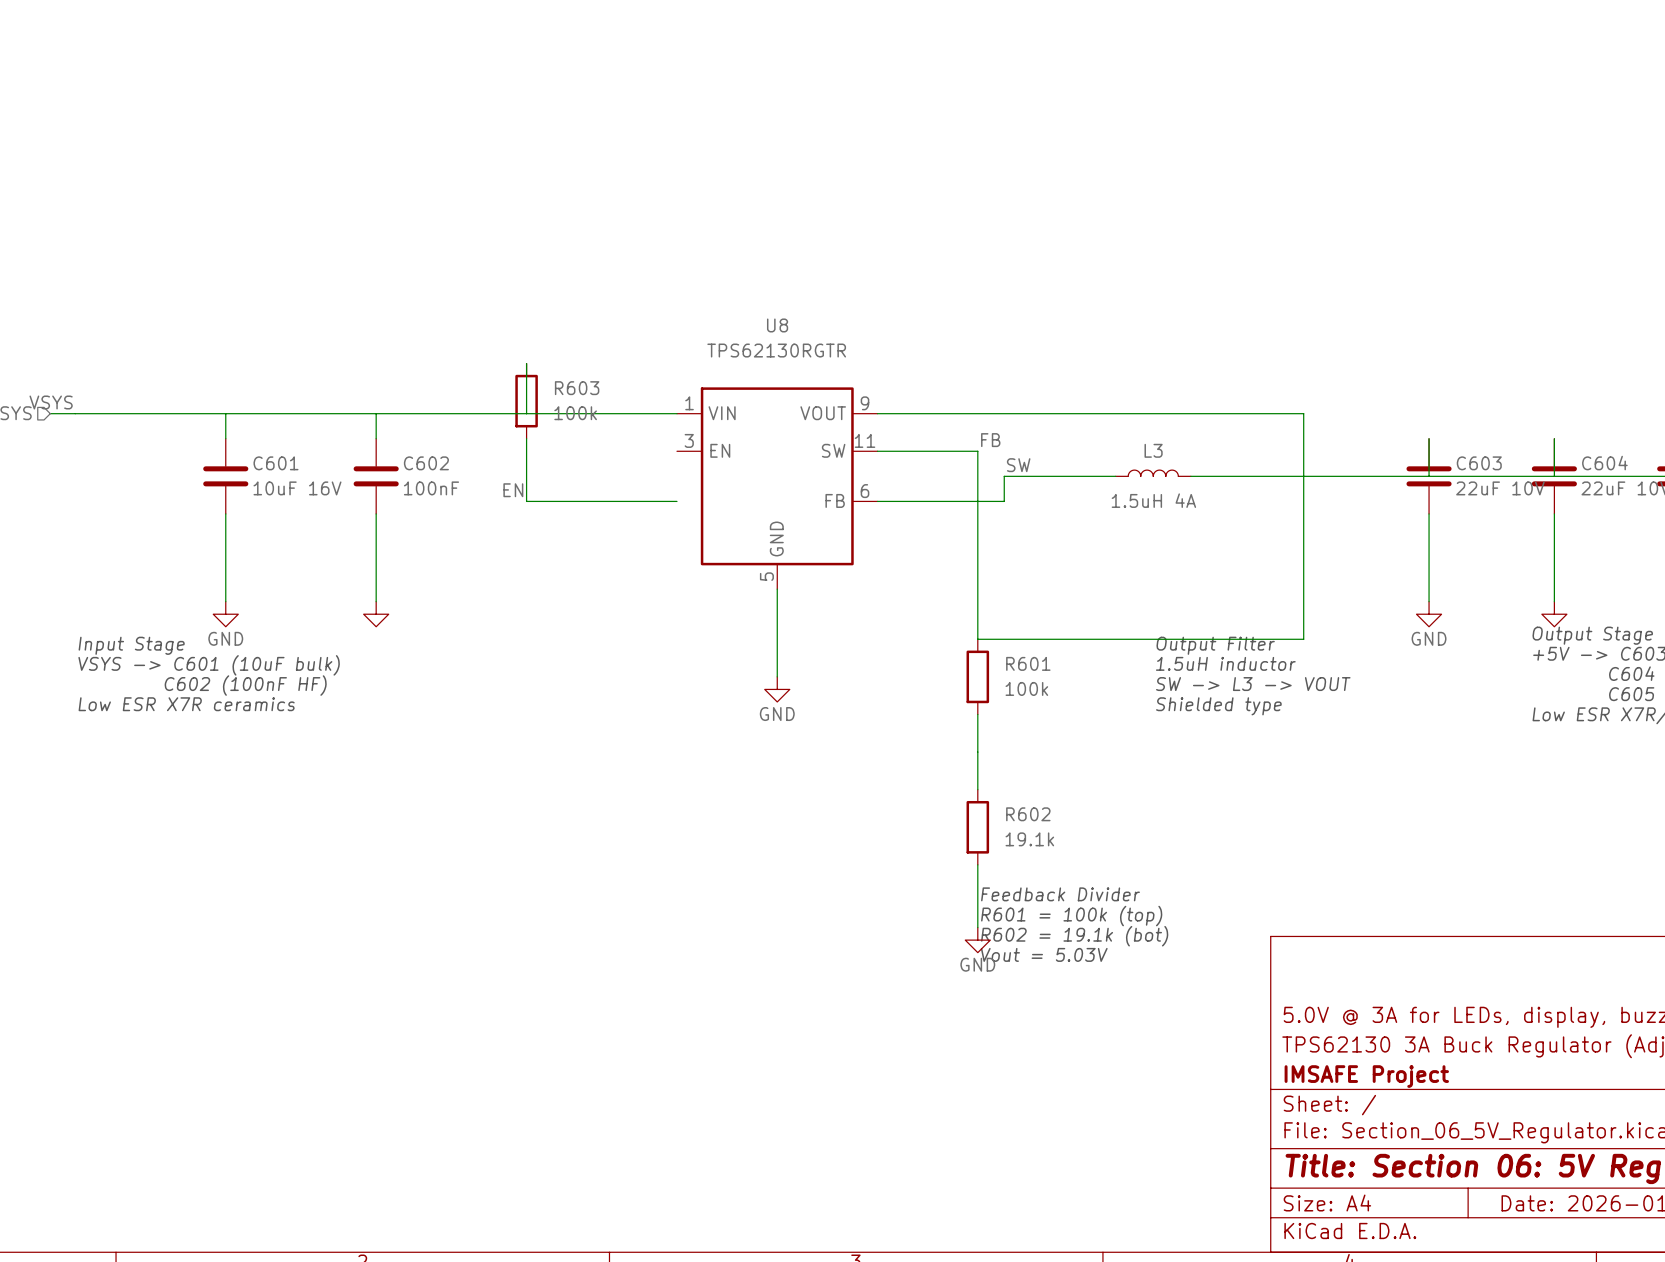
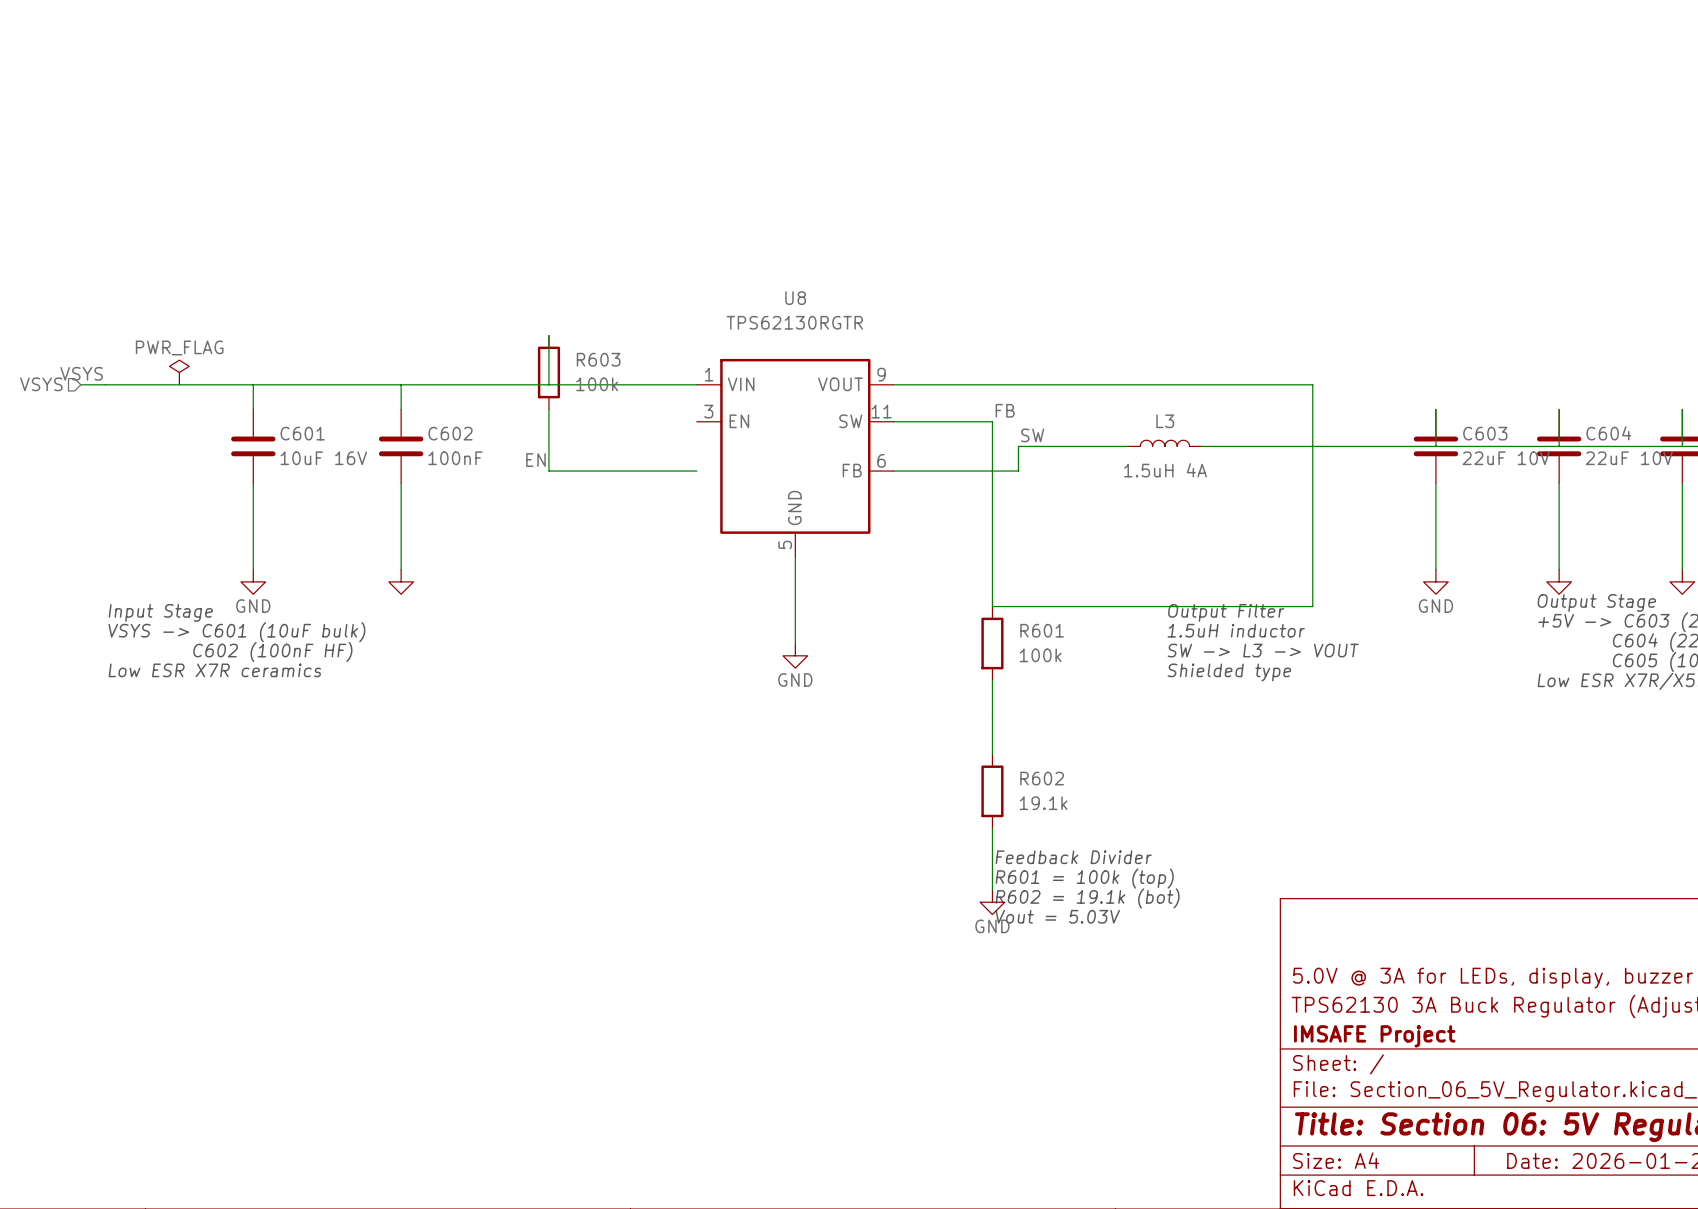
power symbol: none -> PWR_FLAG (179, 372)

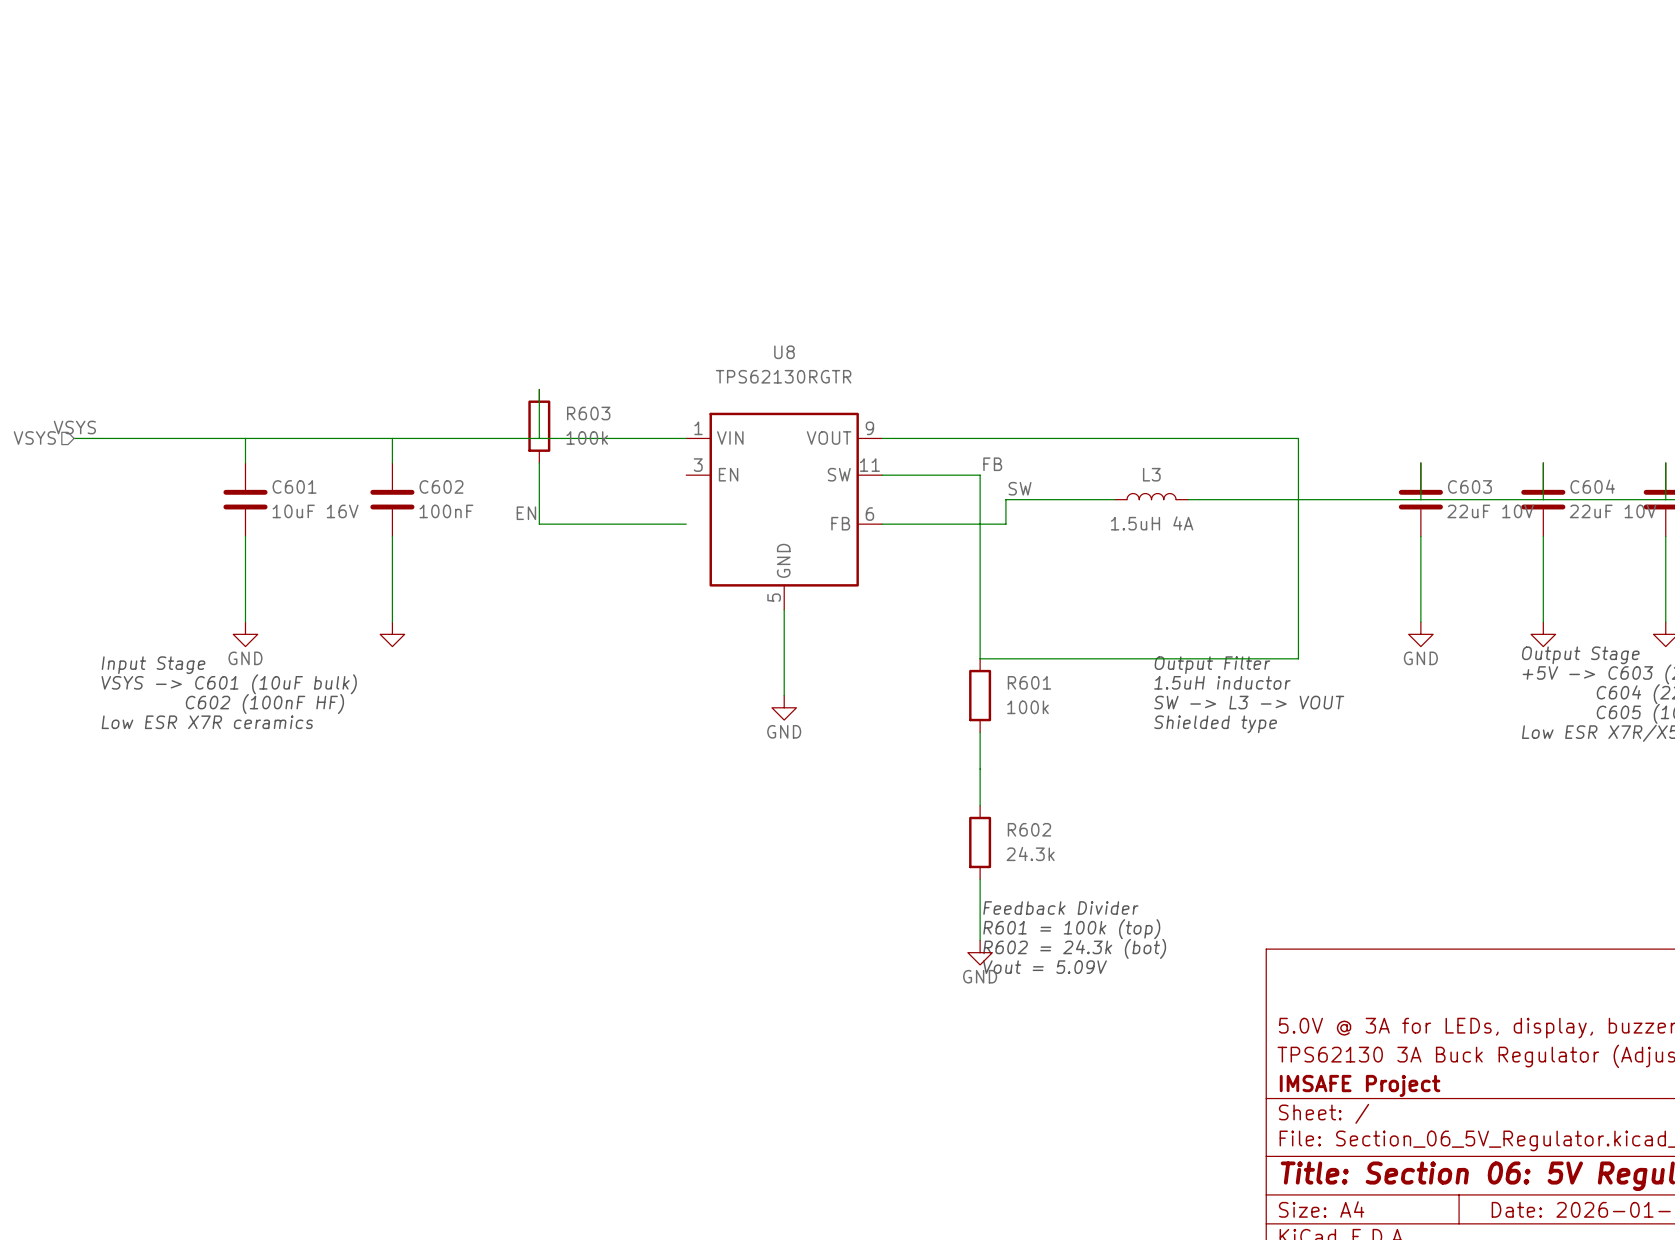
power symbol: PWR_FLAG (179, 372) -> none
R602 value: 19.1k (1043, 803) -> 24.3k (1030, 853)
text: R602 = 19.1k (bot) (1087, 898) -> R602 = 24.3k (bot) (1074, 948)
text: Vout = 5.03V (1057, 916) -> Vout = 5.09V (1044, 967)

